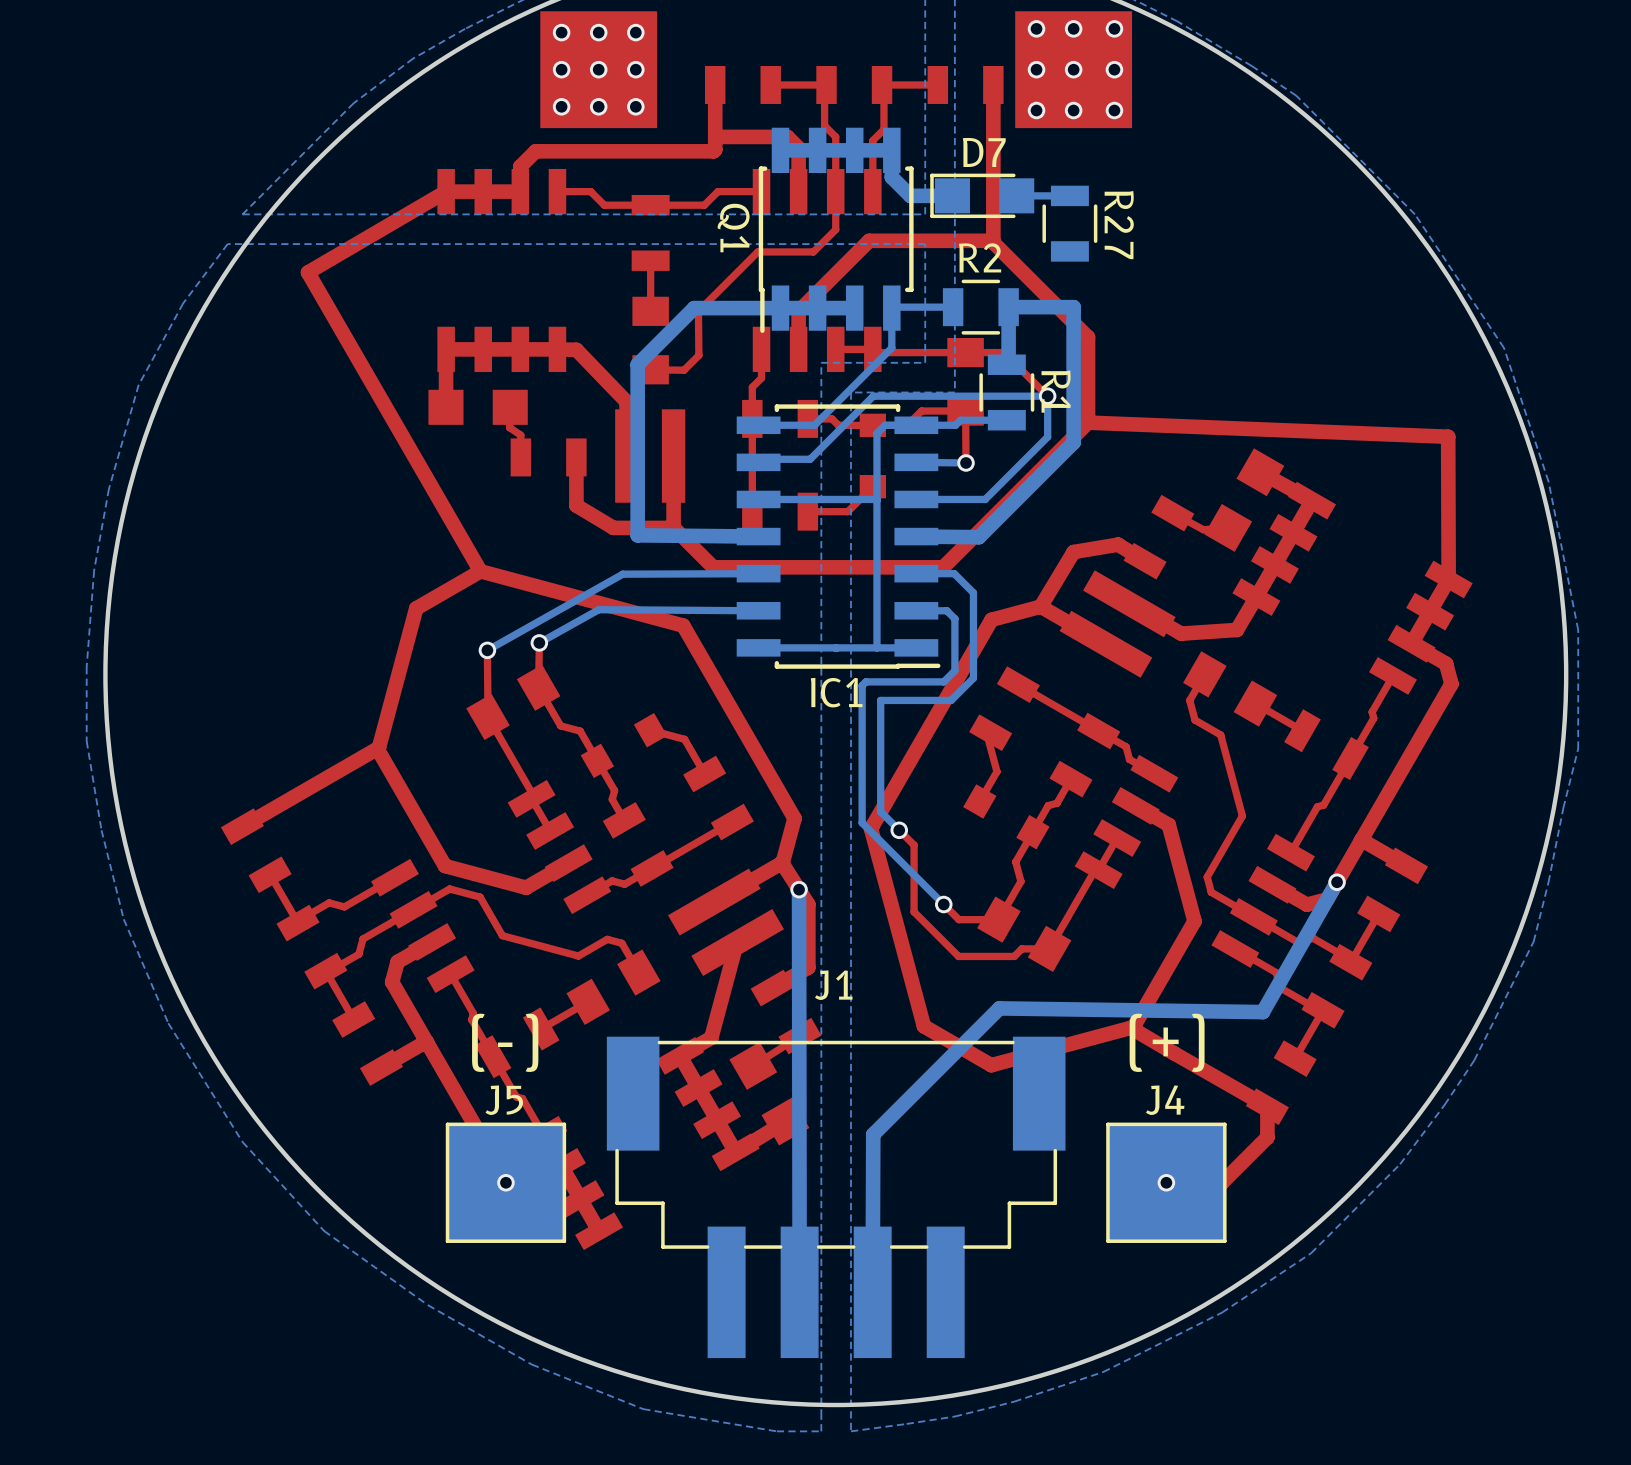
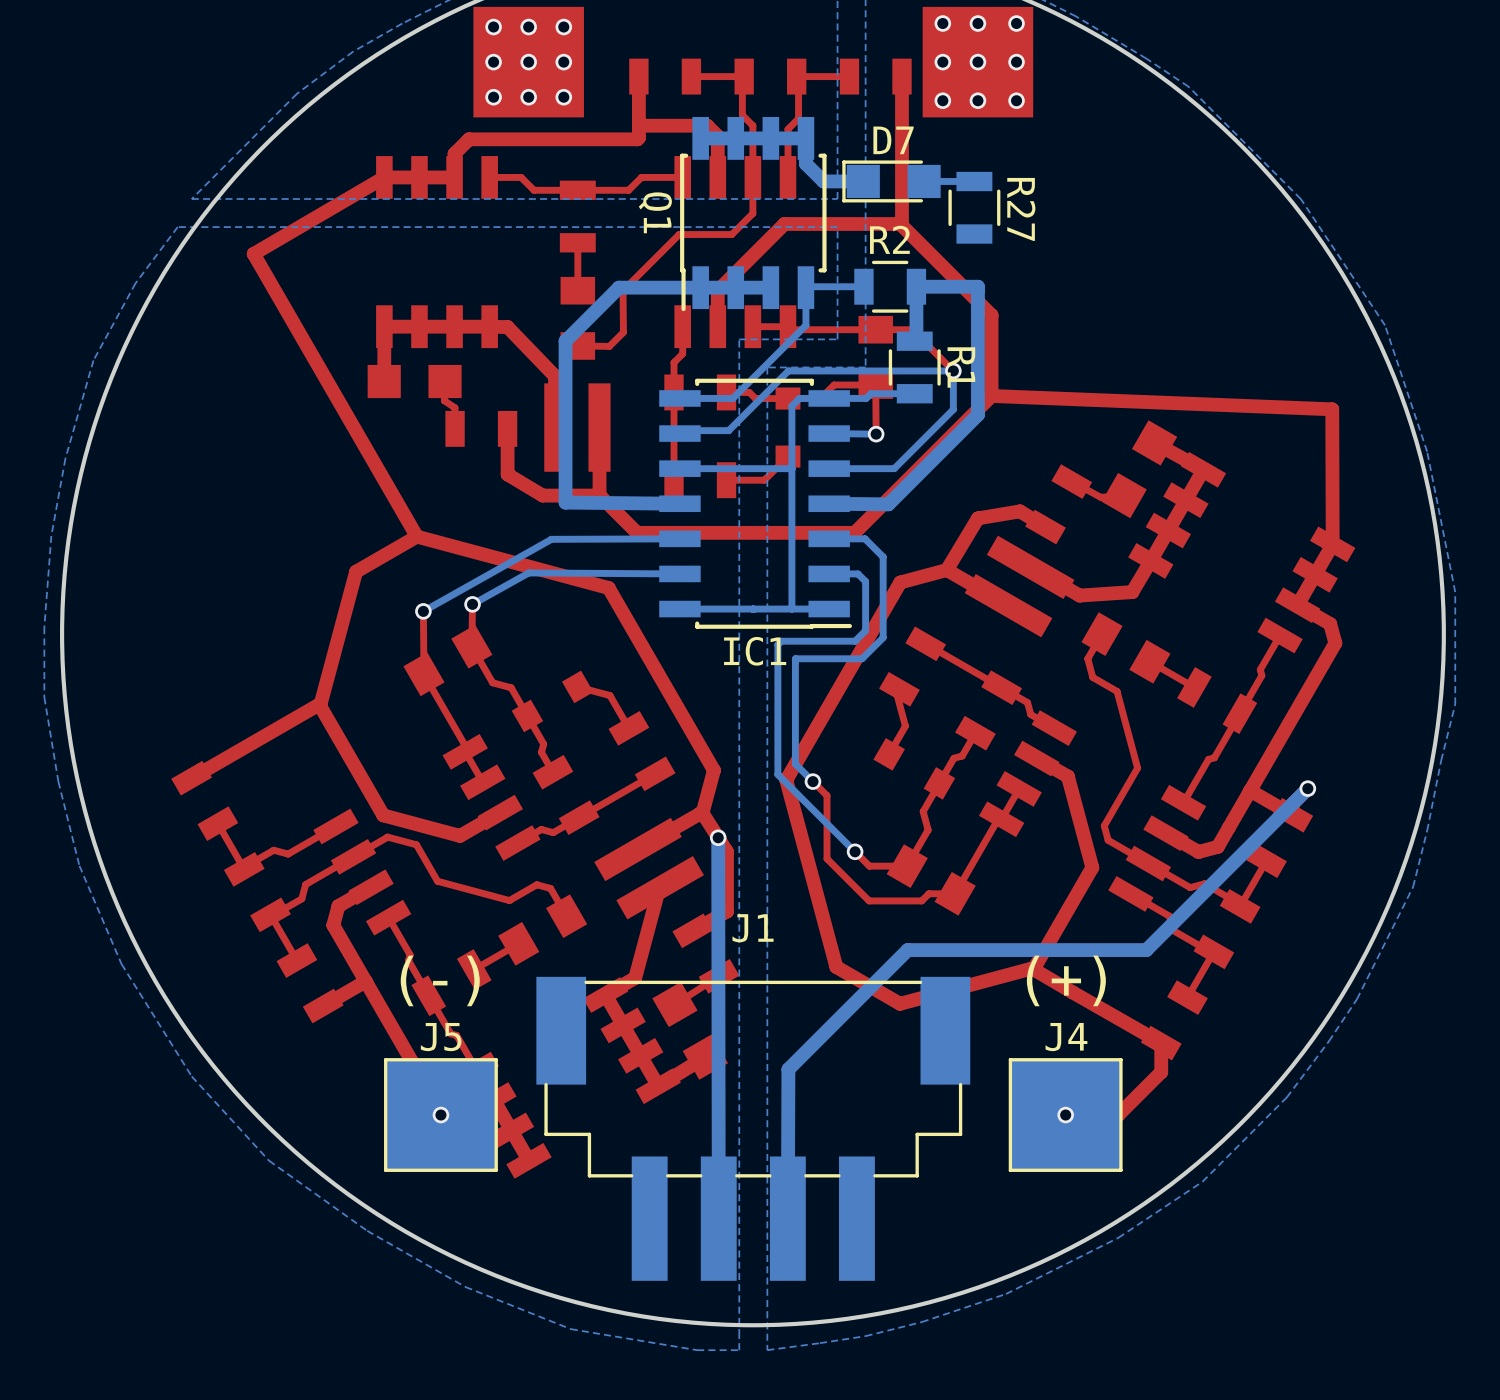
bottom track: (1337, 882) (1262, 1012) (999, 1008) -> (1307, 788) (1146, 950) (907, 950)
via position: (1337, 882) -> (1307, 788)

